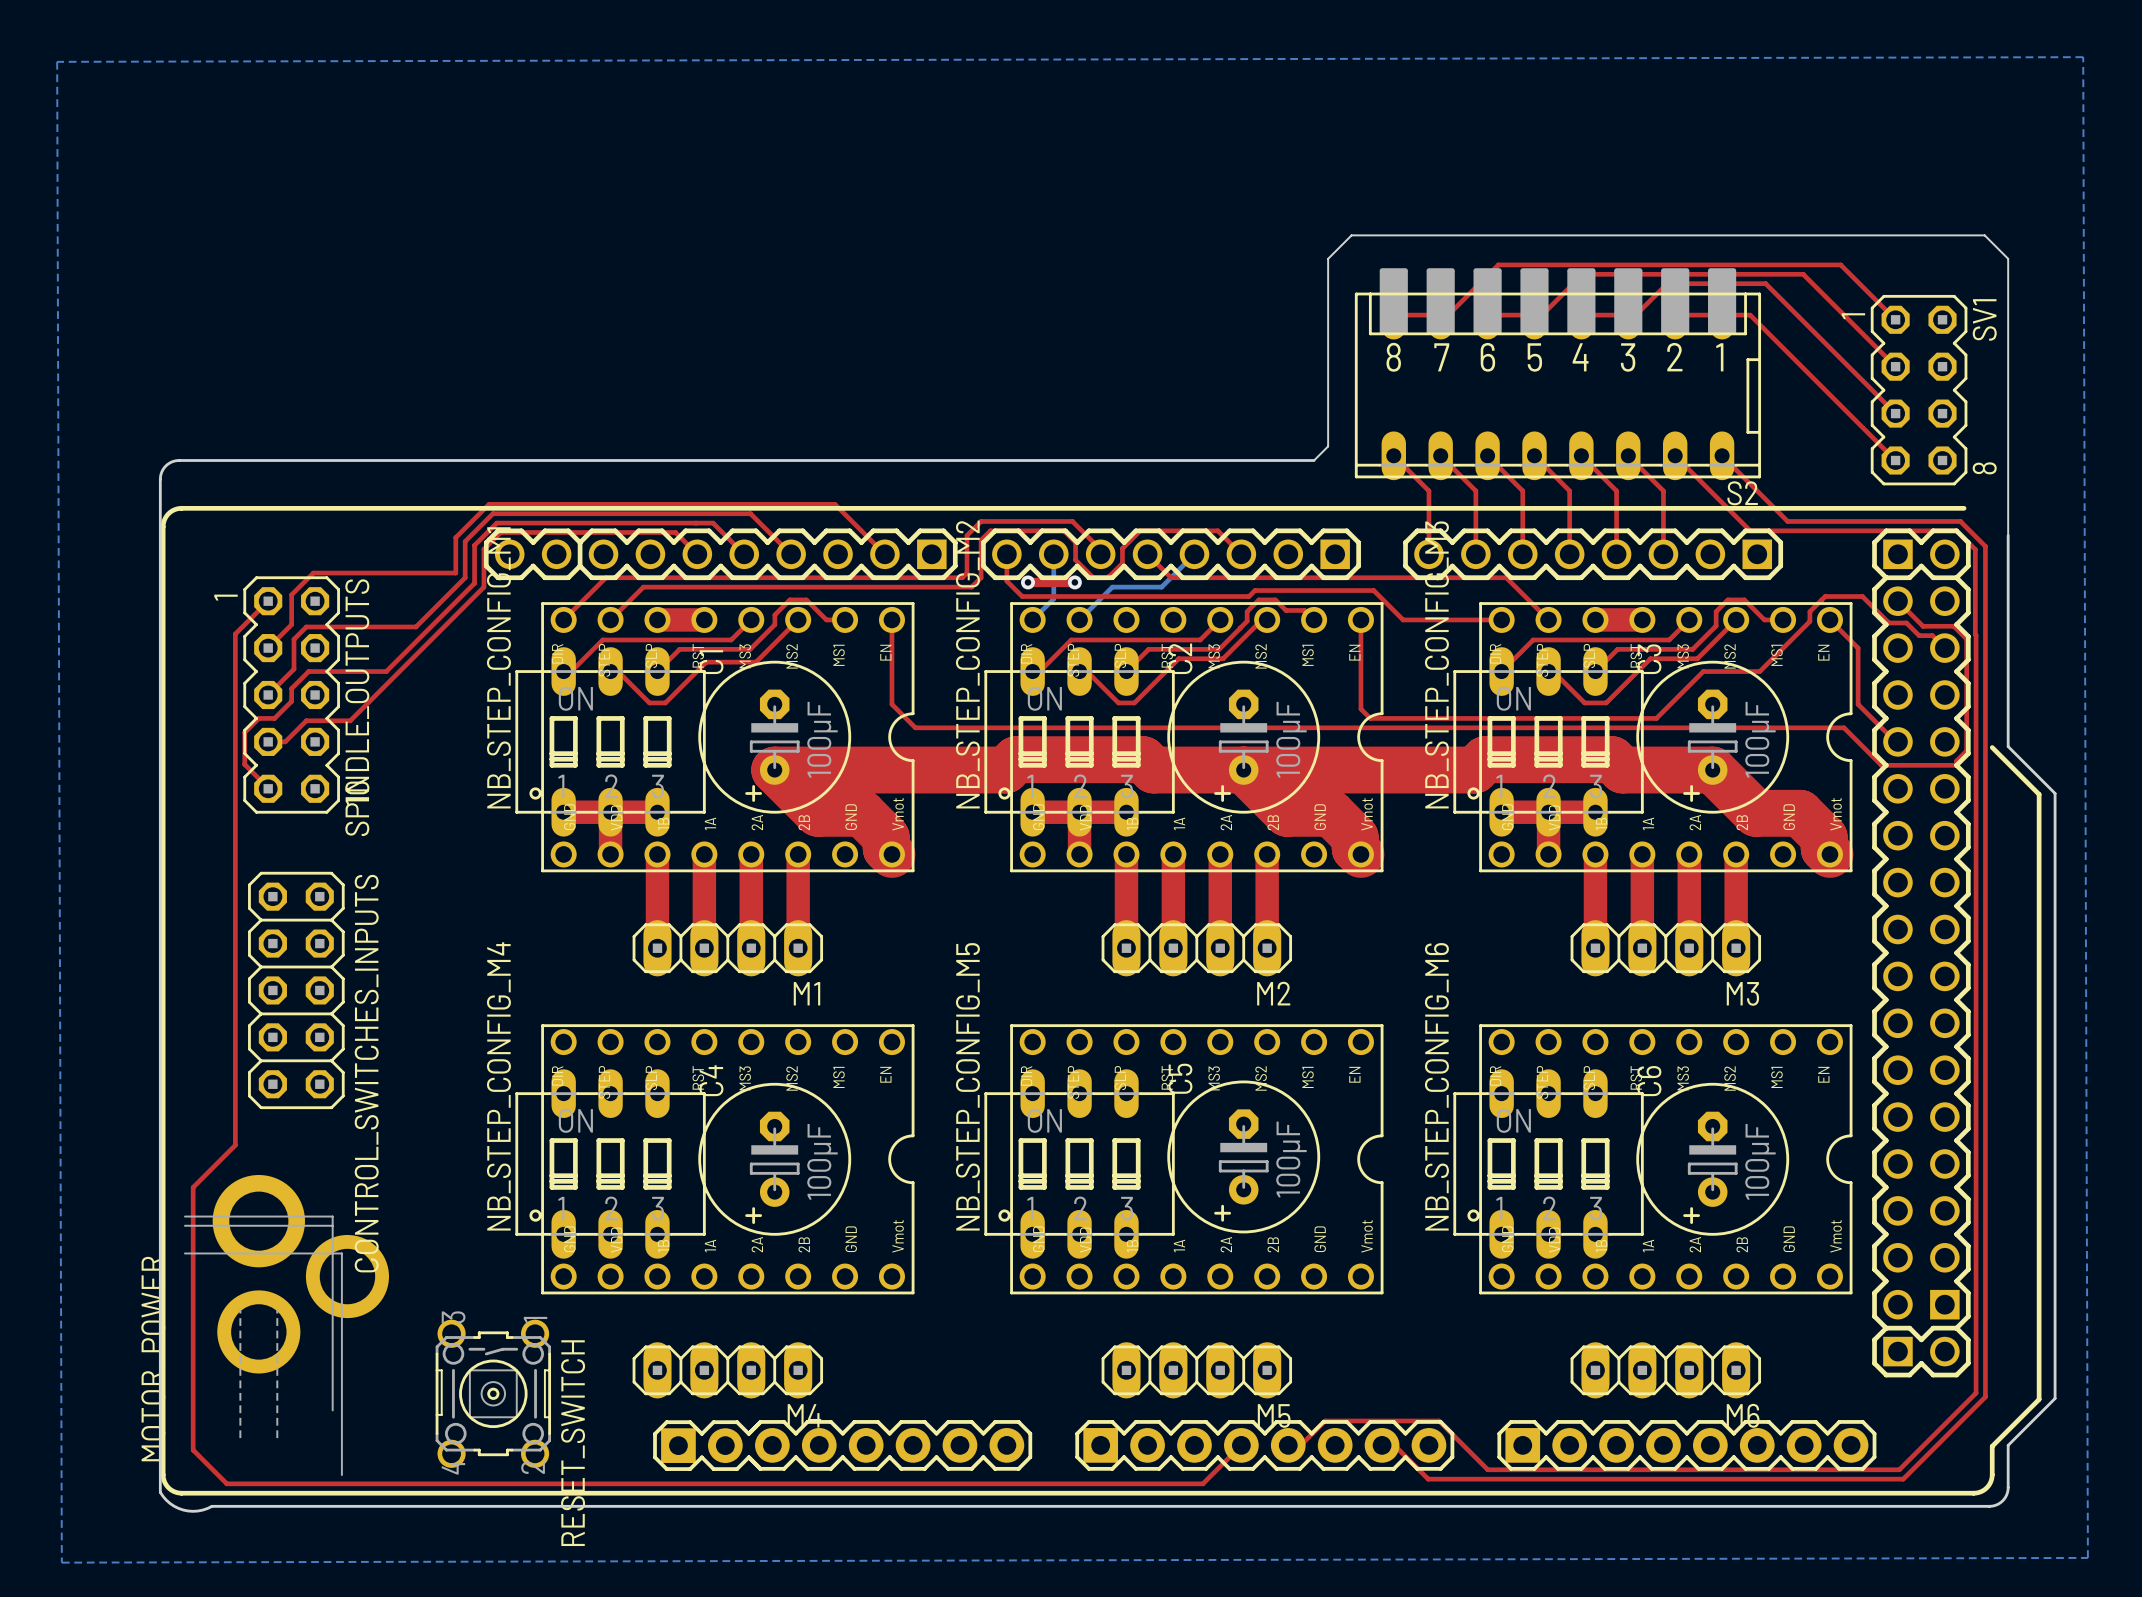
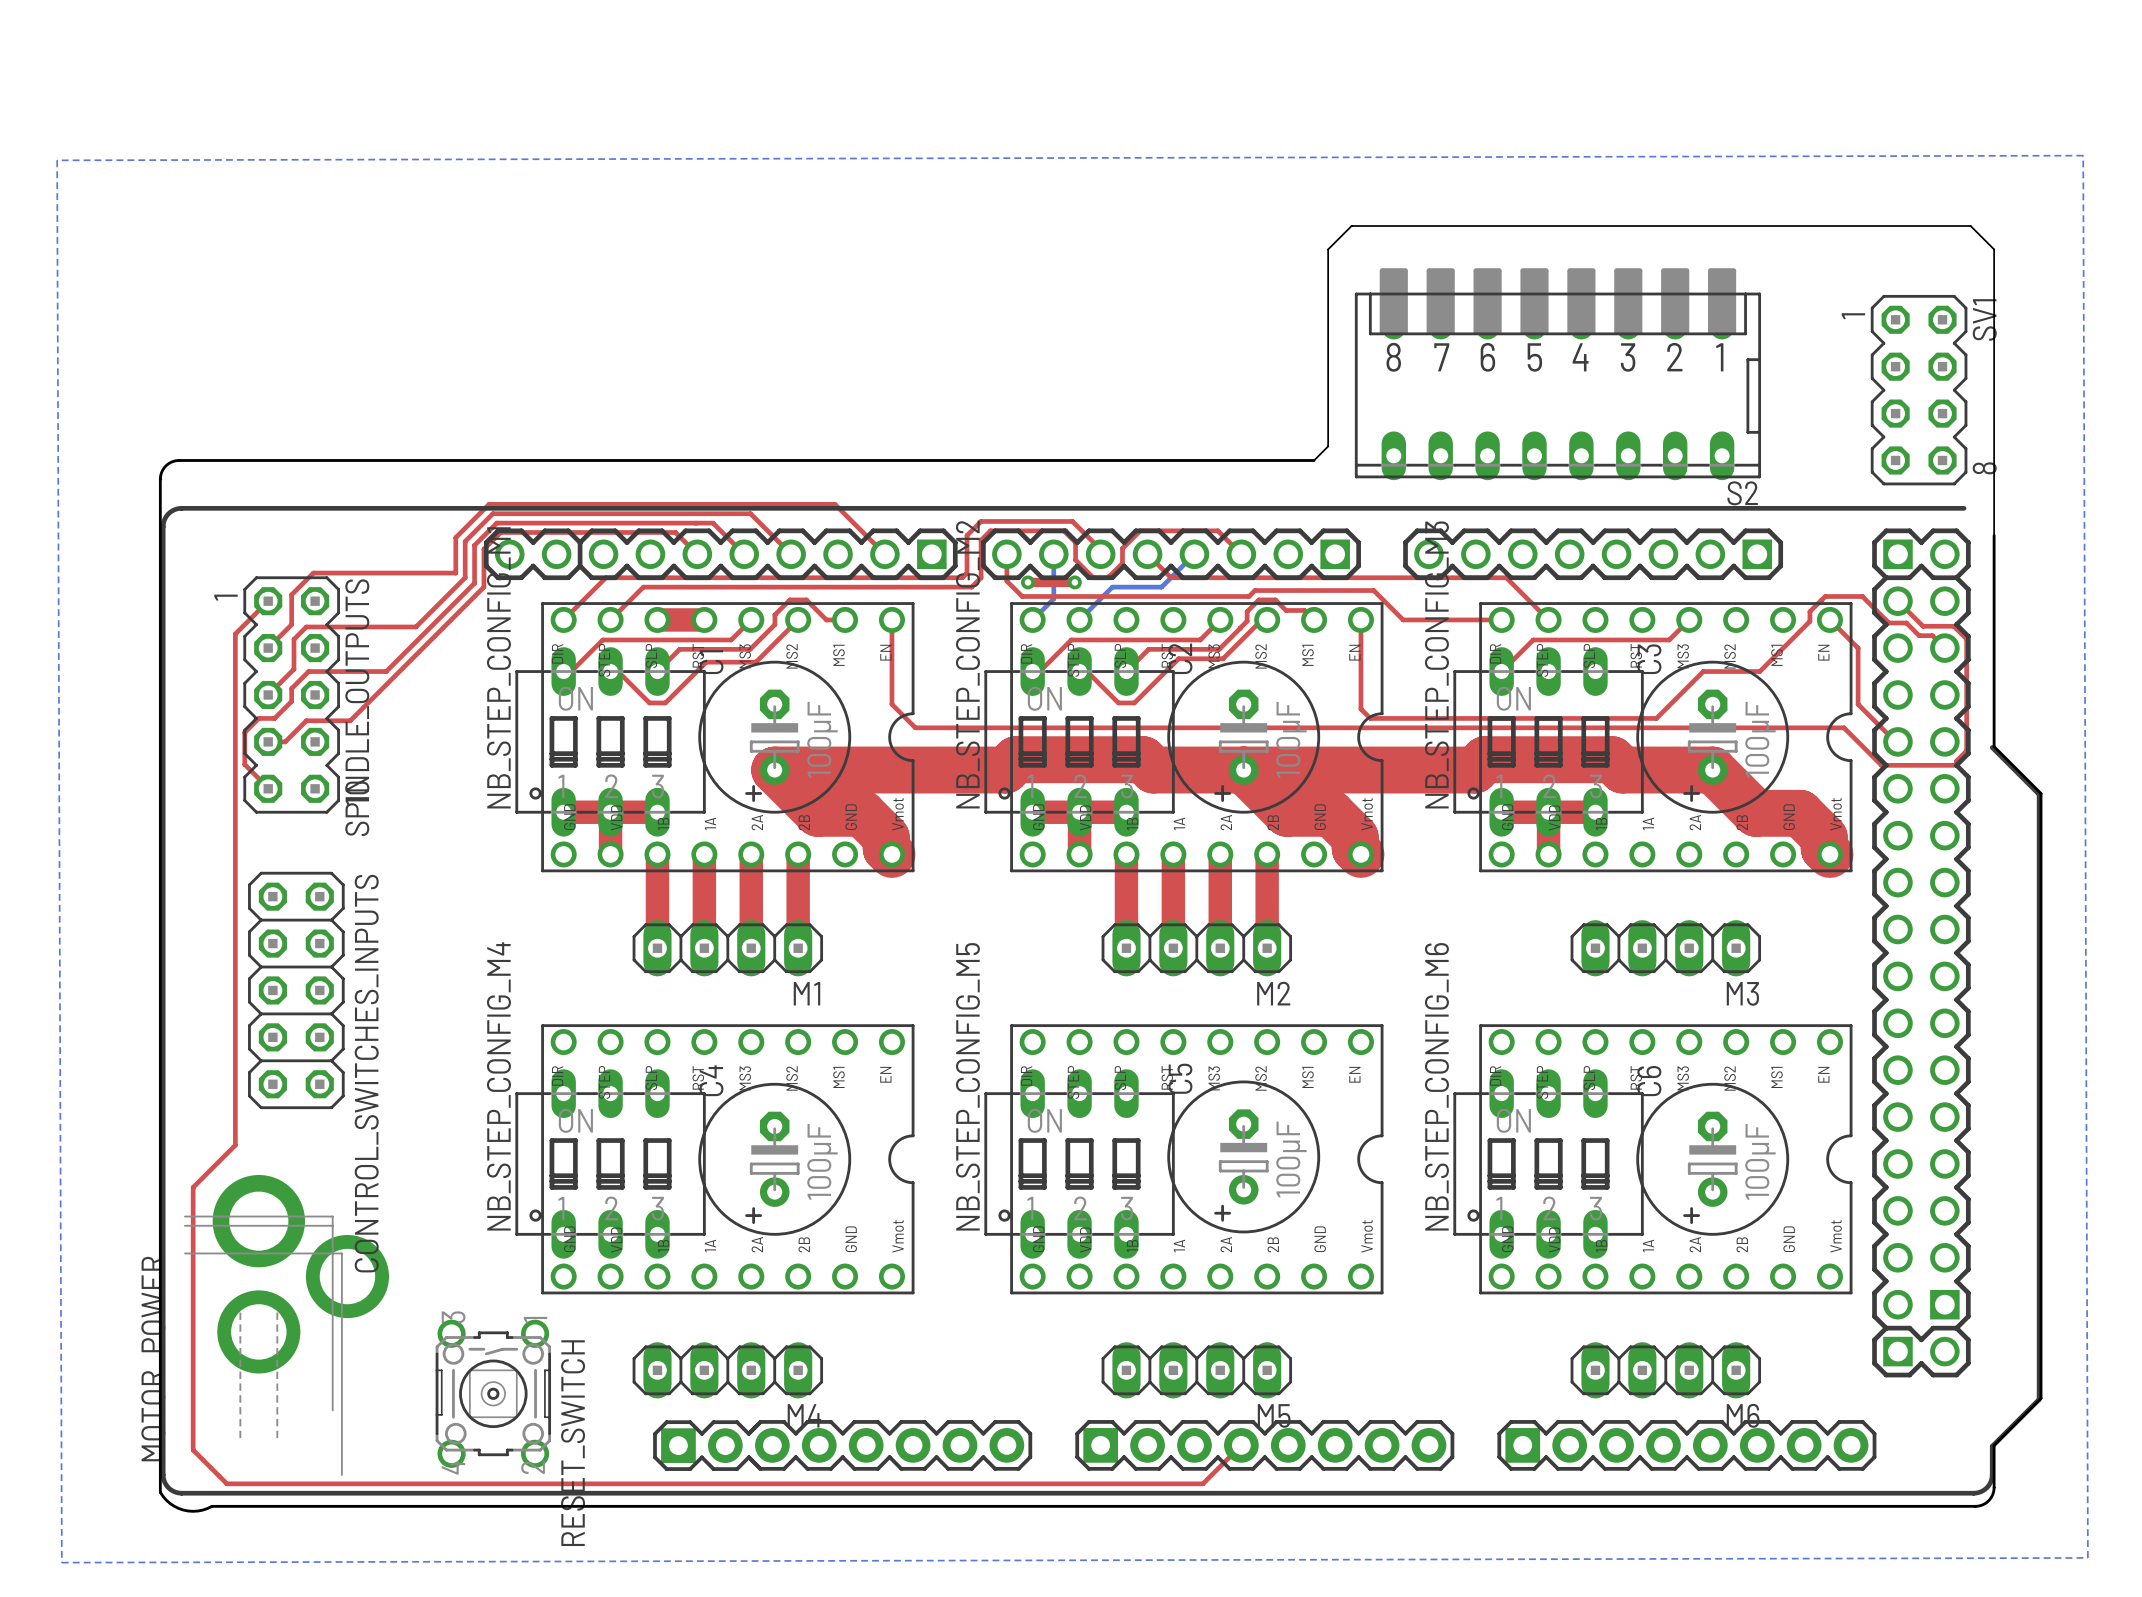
board edge: (1328, 258) (1351, 235) (1984, 235) (2008, 258) (2008, 746) (2055, 793) (2055, 1398) (2008, 1445) (2008, 1490) (2004, 1499) (1994, 1505) (1975, 1506) -> (1328, 258) (1328, 249) (1351, 225) (1970, 225) (1994, 249) (1994, 746) (2041, 793) (2041, 1398) (1994, 1445) (1993, 1492) (1986, 1502) (1975, 1506)
top track: (1393, 315) (1448, 315) (1498, 264) (1840, 264) (1895, 319) -> none
top track: (1487, 315) (1542, 315) (1582, 274) (1803, 274) (1895, 366) -> none
top track: (1581, 315) (1635, 315) (1667, 283) (1765, 283) (1895, 413) -> none
top track: (1675, 315) (1750, 315) (1895, 460) -> none
top track: (1393, 455) (1428, 490) (1428, 554) -> none
top track: (1440, 455) (1475, 490) (1475, 554) -> none
top track: (1487, 455) (1522, 490) (1522, 554) -> none
top track: (1534, 455) (1569, 490) (1569, 554) -> none
top track: (1581, 455) (1616, 490) (1616, 554) -> none
top track: (1628, 455) (1663, 490) (1663, 554) -> none
top track: (1675, 455) (1750, 530) (1956, 530) (1975, 549) (1976, 1393) (1899, 1469) (1487, 1469) (1439, 1420) (1325, 1420) (1300, 1445) (1288, 1445) -> none
top track: (1722, 455) (1787, 521) (1960, 521) (1985, 546) (1985, 1396) (1903, 1479) (1428, 1479) (1394, 1445) (1382, 1445) -> none
top track: (1595, 619) (1642, 619) -> none
top track: (1736, 619) (1697, 658) (1650, 658) (1606, 702) (1584, 702) (1553, 671) (1548, 671) -> none
top track: (1783, 619) (1764, 619) (1744, 599) (1727, 599) (1716, 611) (1716, 625) (1692, 649) (1617, 649) (1595, 671) -> none
top track: (1595, 854) (1595, 948) -> none
top track: (1642, 854) (1642, 948) -> none
top track: (1689, 854) (1689, 948) -> none
top track: (1736, 854) (1736, 948) -> none
bottom zone outline: (2087, 1557) (2083, 57) (57, 61) (61, 1562) -> (2087, 1557) (2083, 155) (57, 160) (61, 1562)

